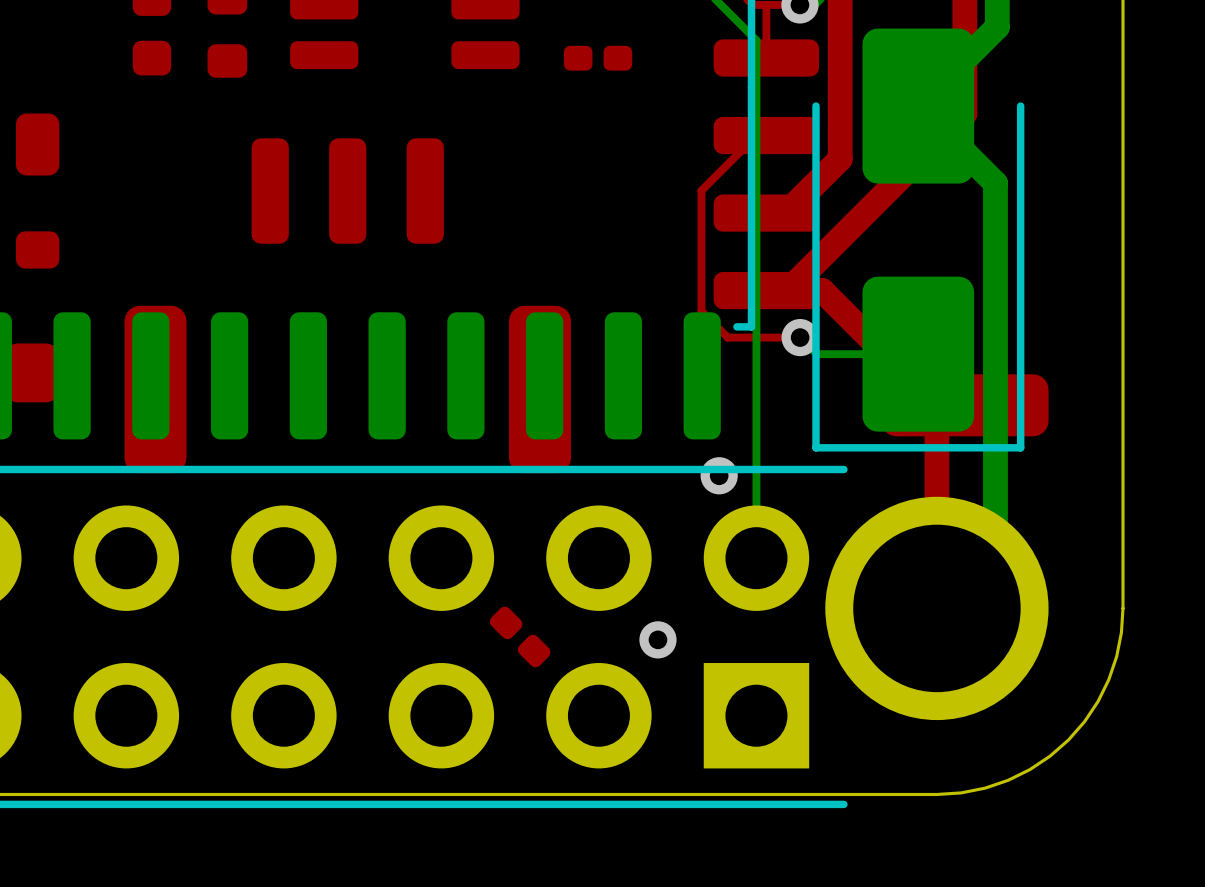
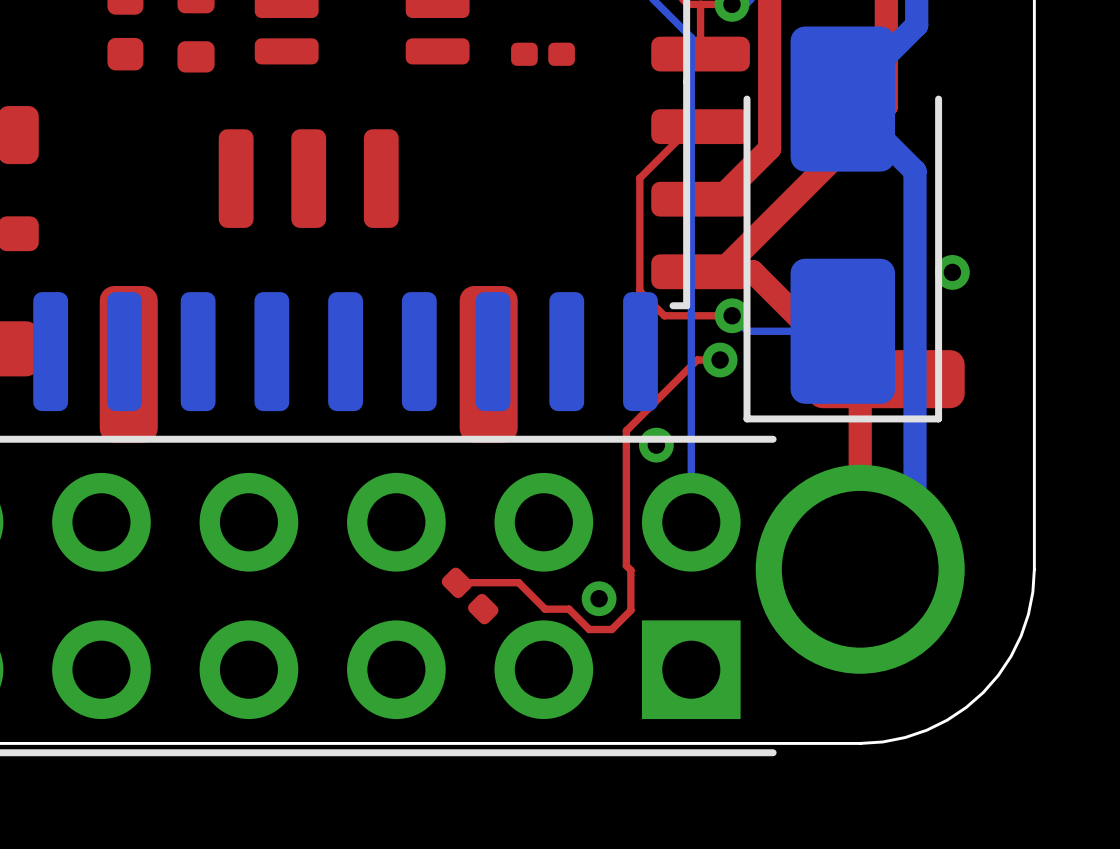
via: none -> (952, 272)
top track: none -> (720, 360) (697, 360) (626, 430) (626, 565) (630, 570) (630, 610) (611, 629) (589, 629) (568, 609) (545, 609) (518, 582) (457, 582)
via: none -> (720, 360)

